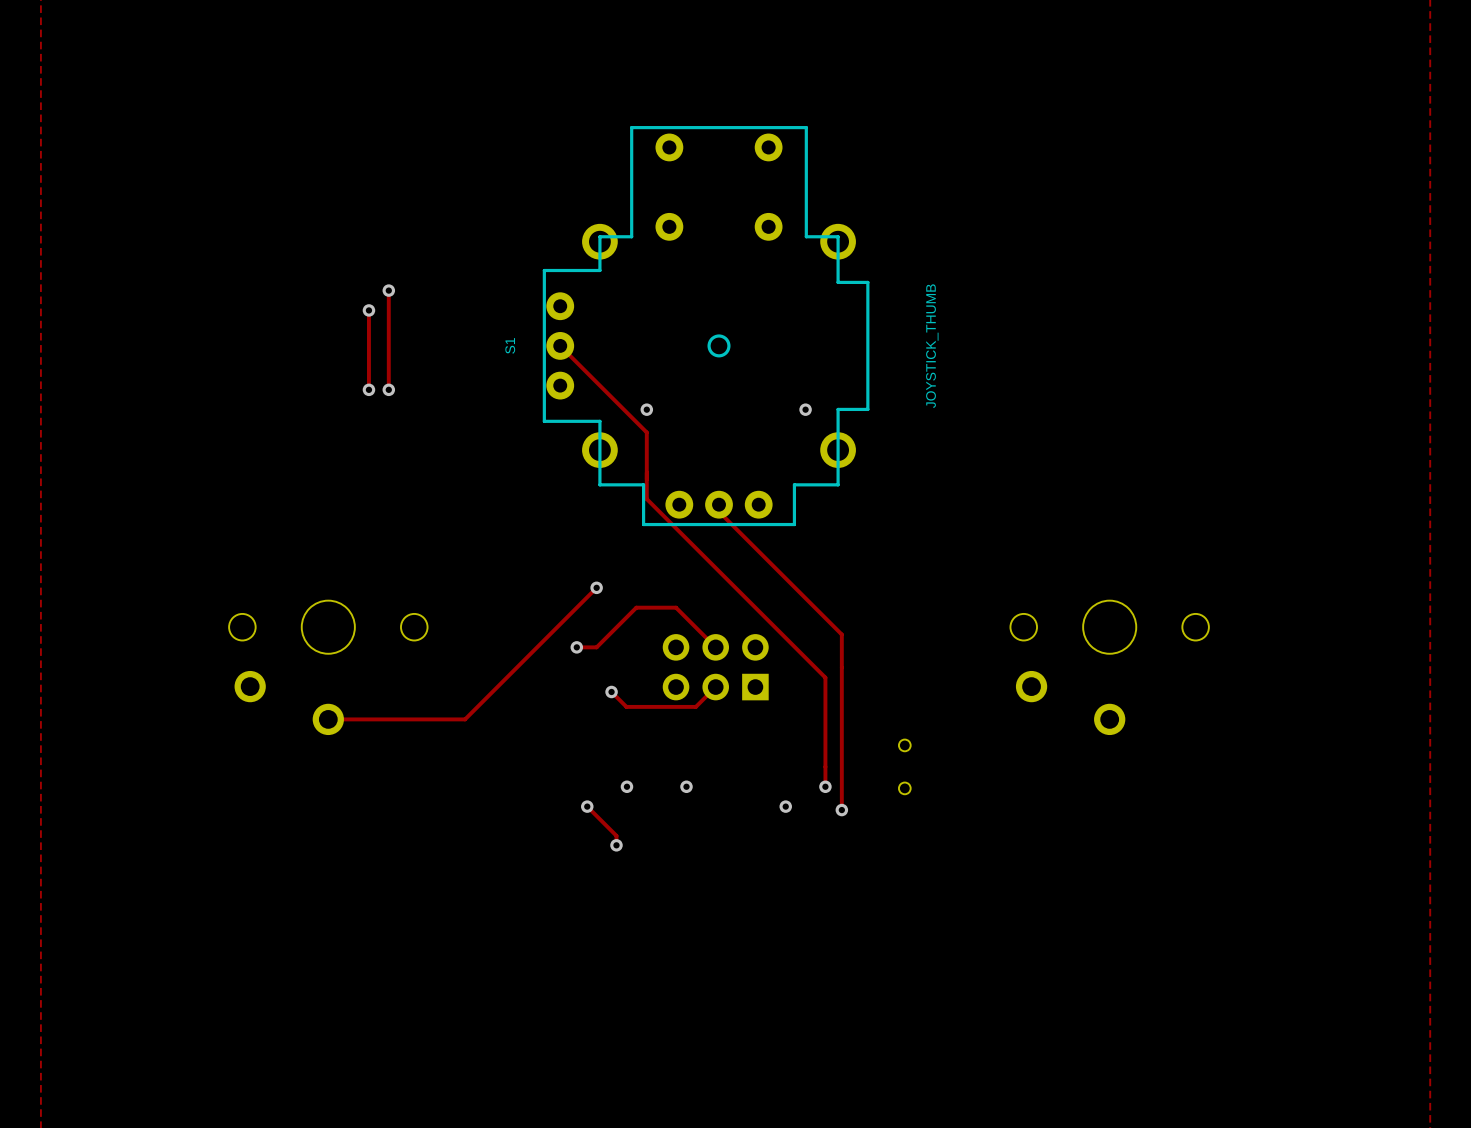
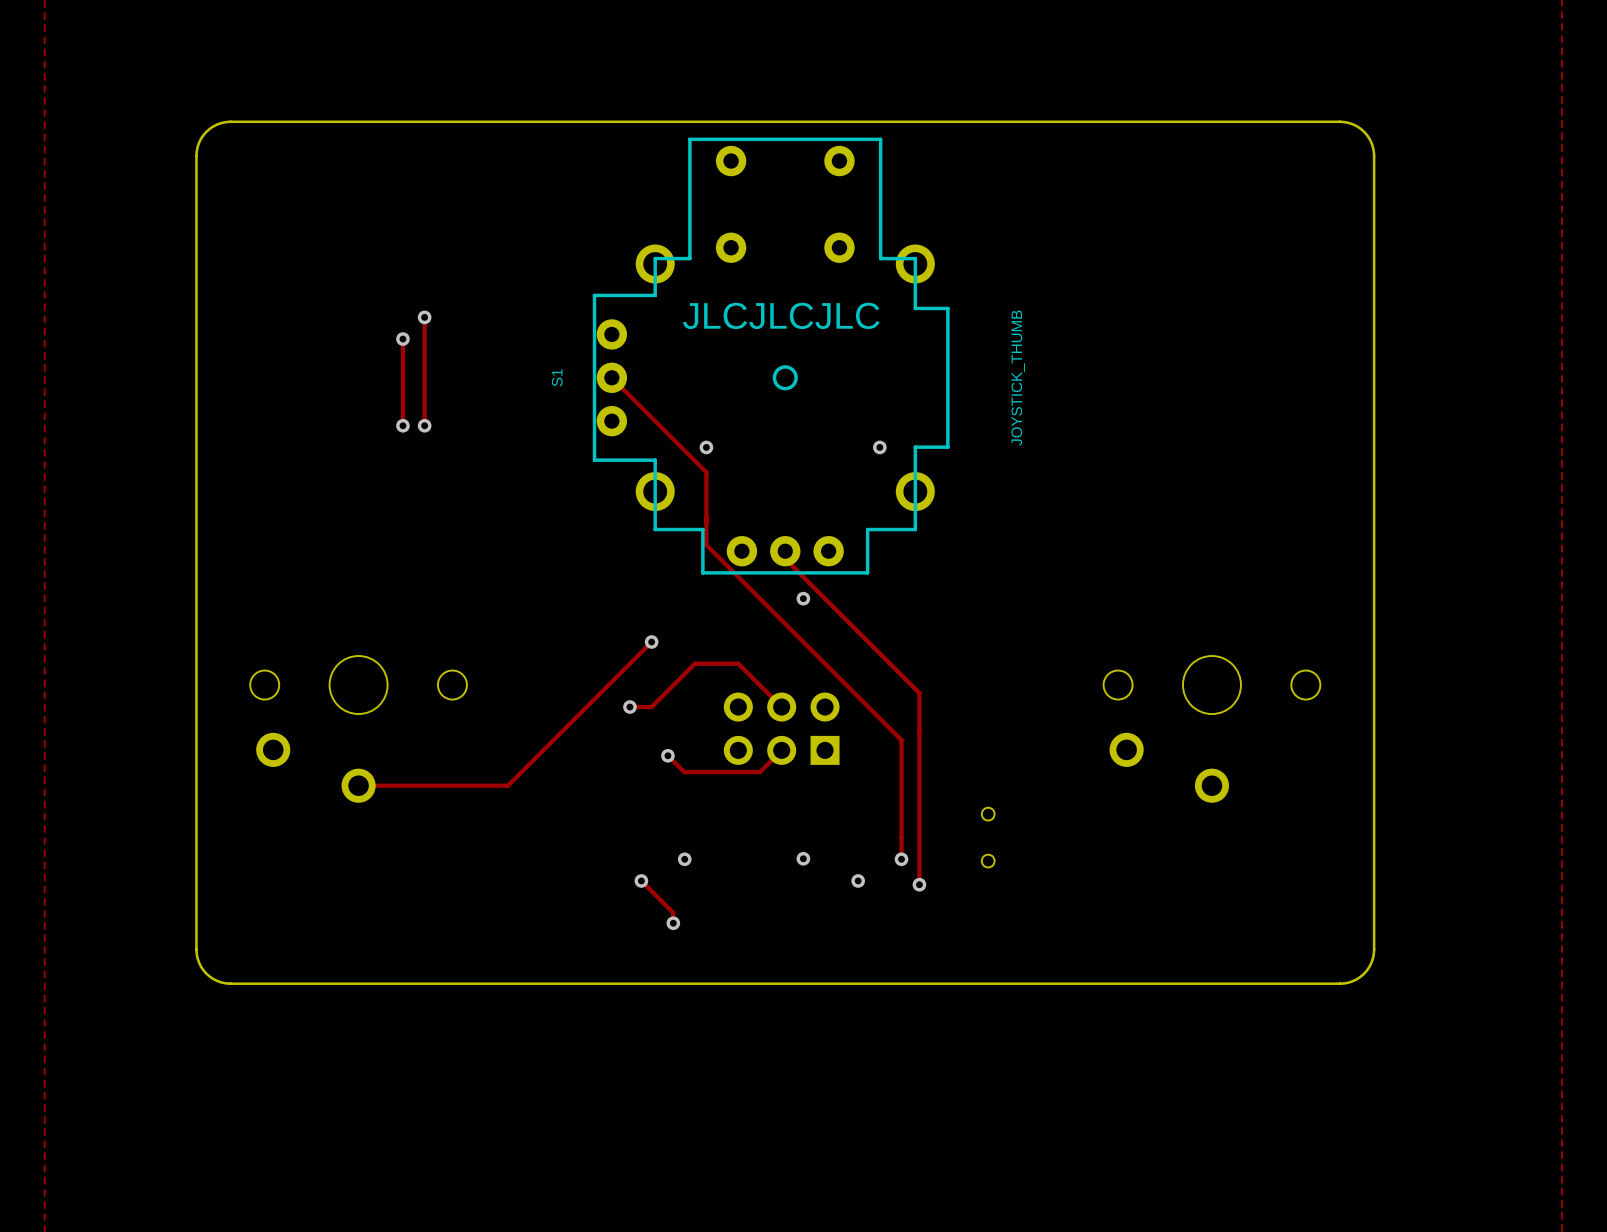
board edge: none -> (230, 121) (1339, 121) (1353, 124) (1360, 128) (1369, 138) (1374, 155) (1374, 949) (1371, 962) (1367, 970) (1353, 981) (1339, 983) (230, 983) (221, 982) (209, 976) (199, 962) (196, 949) (196, 155) (199, 142) (206, 131) (217, 124) (230, 121)
text: none -> JLCJLCJLC (781, 315)
via: none -> (803, 598)
via position: (686, 786) -> (803, 858)

